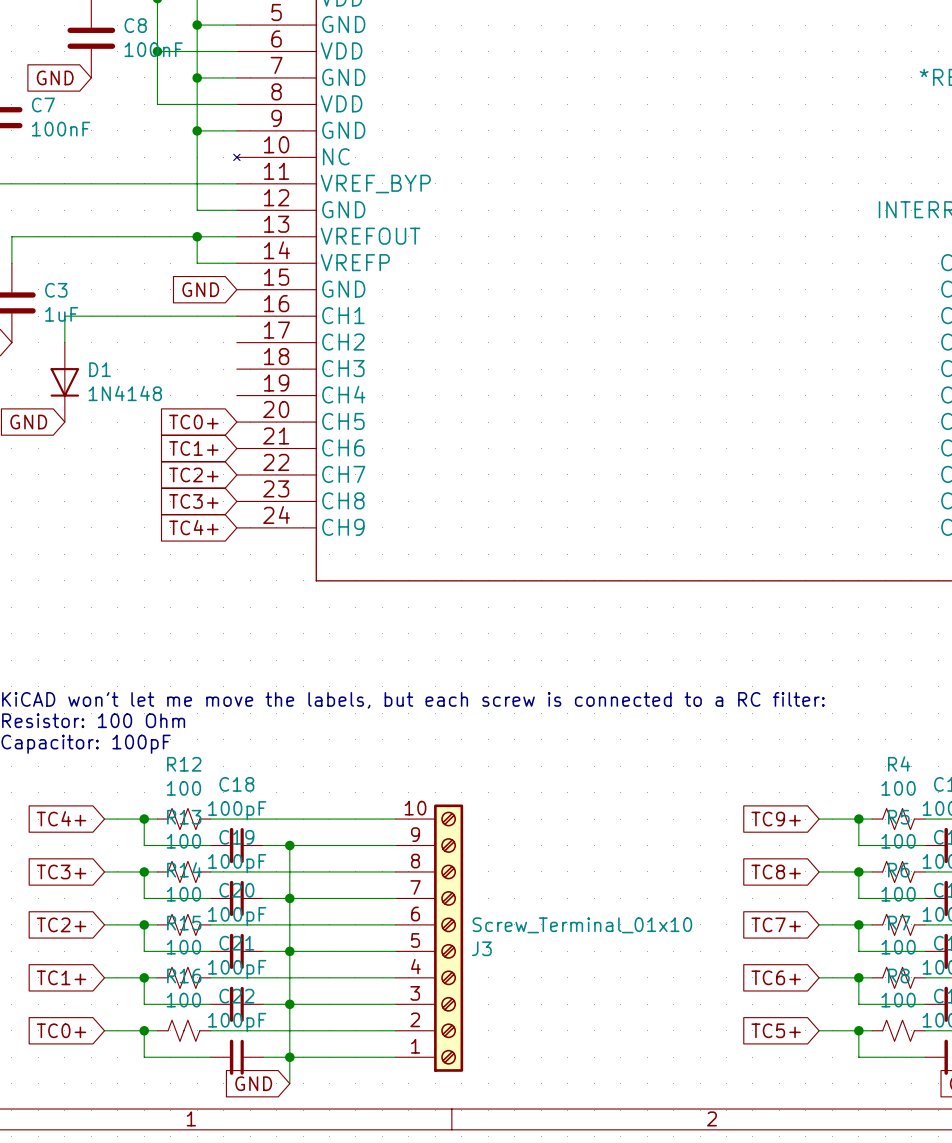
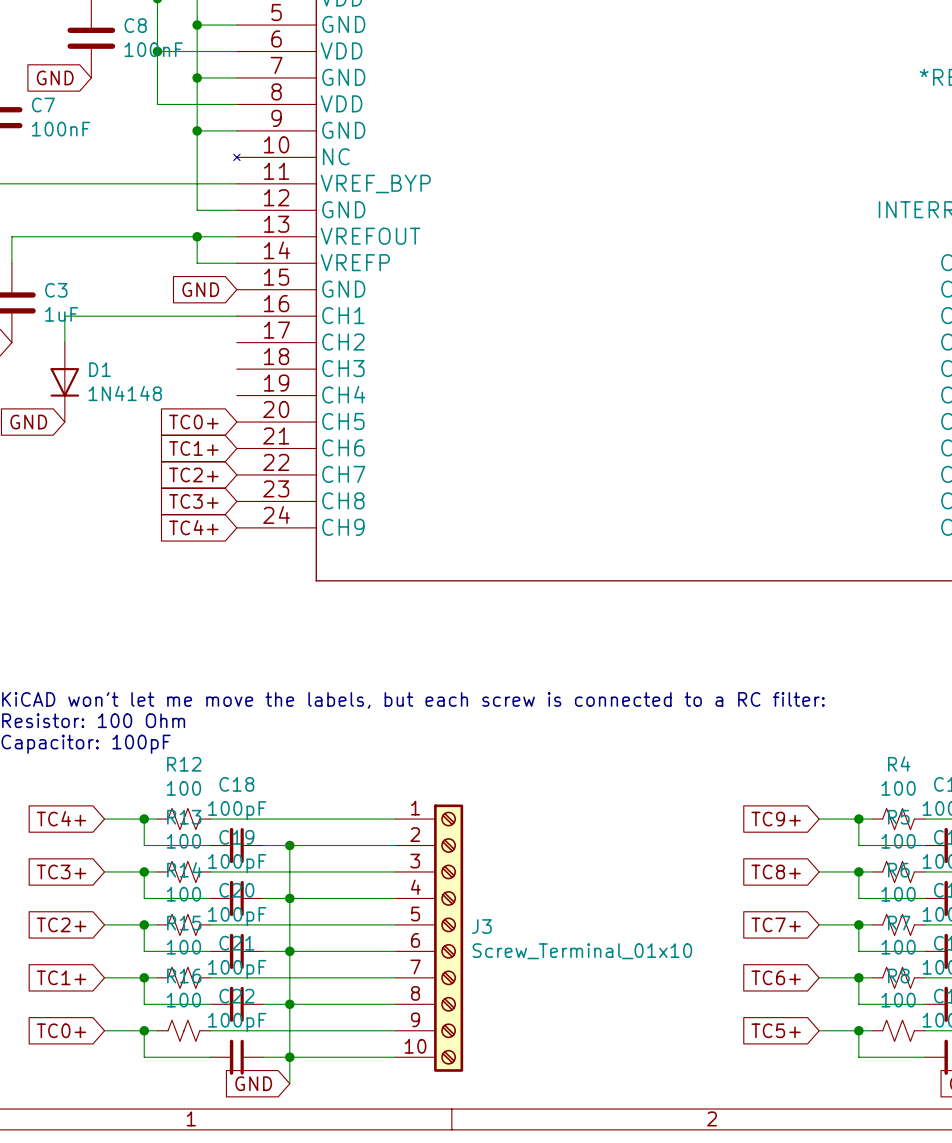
J3 flip: as is (448, 938) -> up-down (448, 938)

